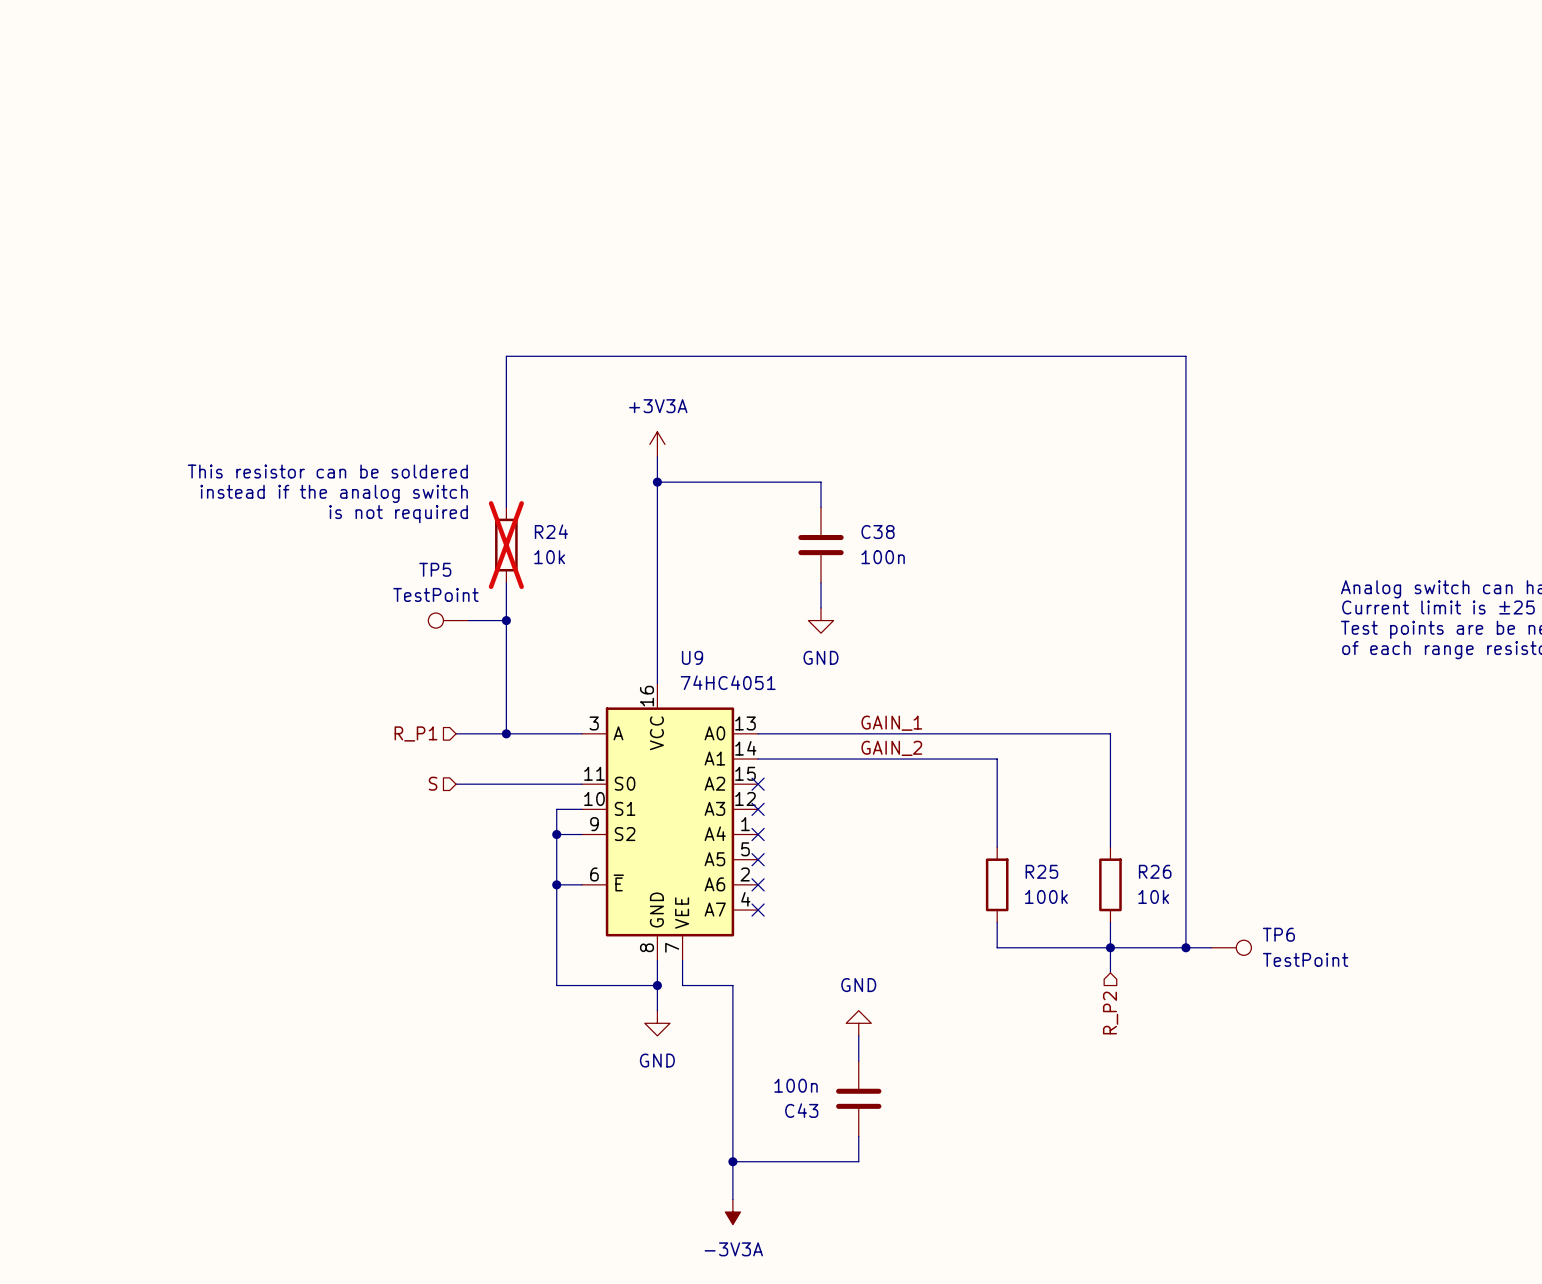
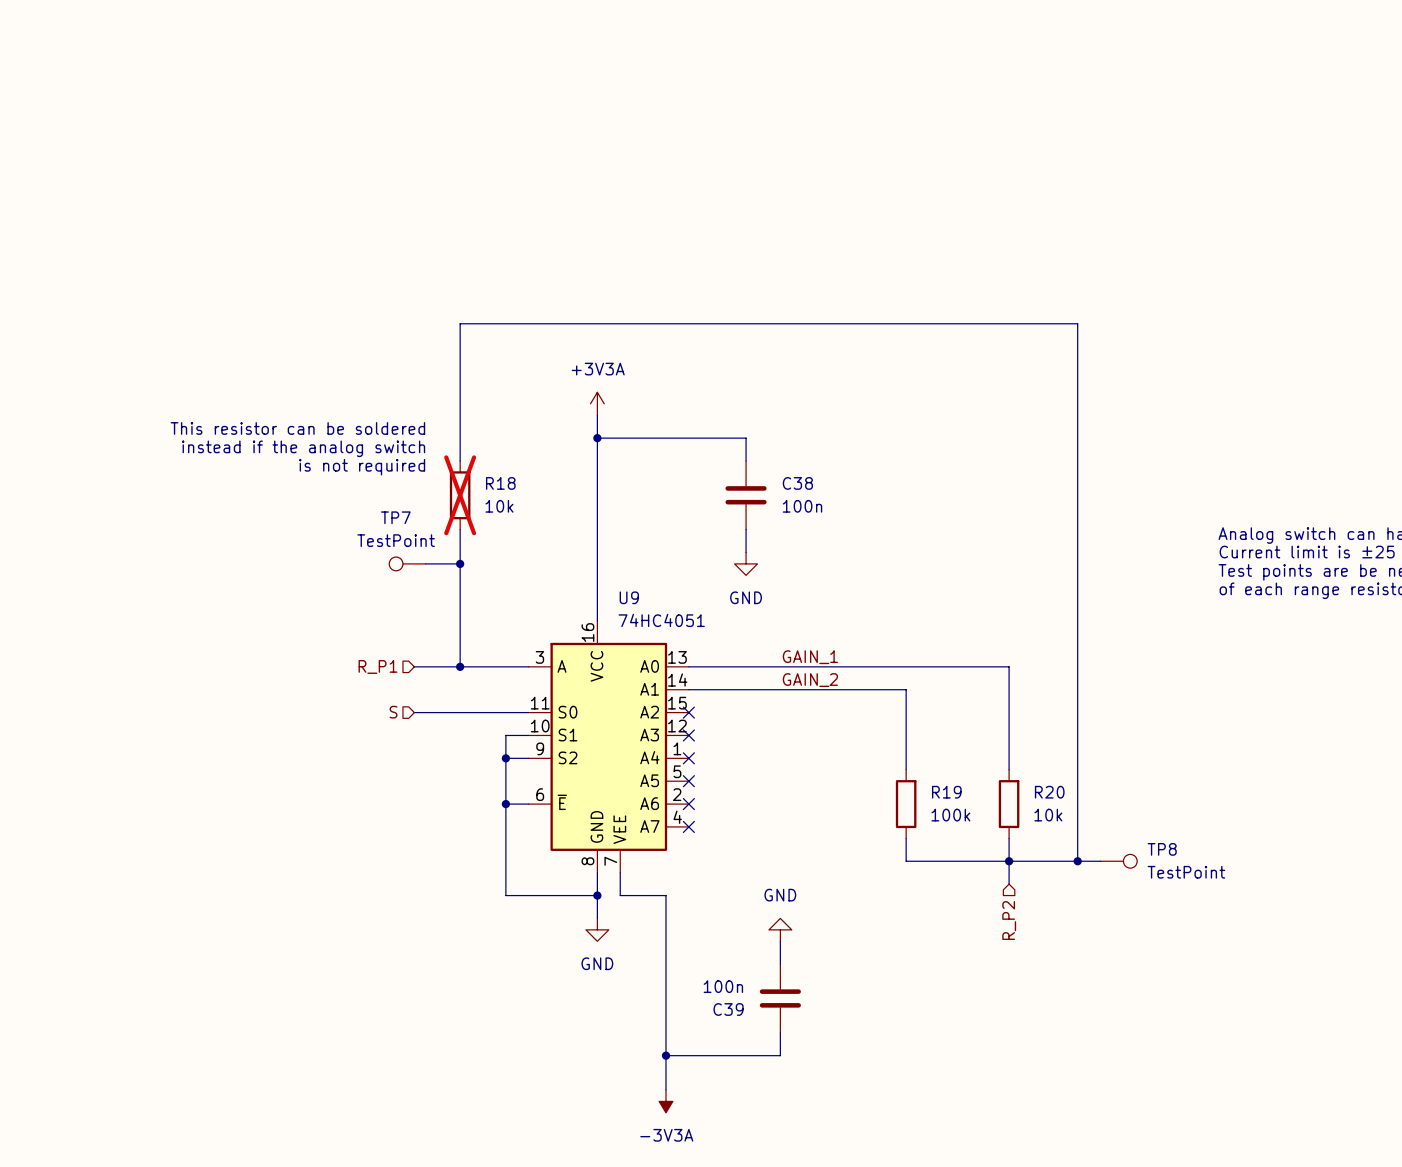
R24 name: R24 (551, 531) -> R18 (500, 483)
TP5 name: TP5 (435, 569) -> TP7 (395, 517)
R25 name: R25 (1041, 871) -> R19 (946, 792)
R26 name: R26 (1155, 871) -> R20 (1049, 792)
TP6 name: TP6 (1278, 934) -> TP8 (1162, 849)
C43 name: C43 (801, 1110) -> C39 (728, 1009)

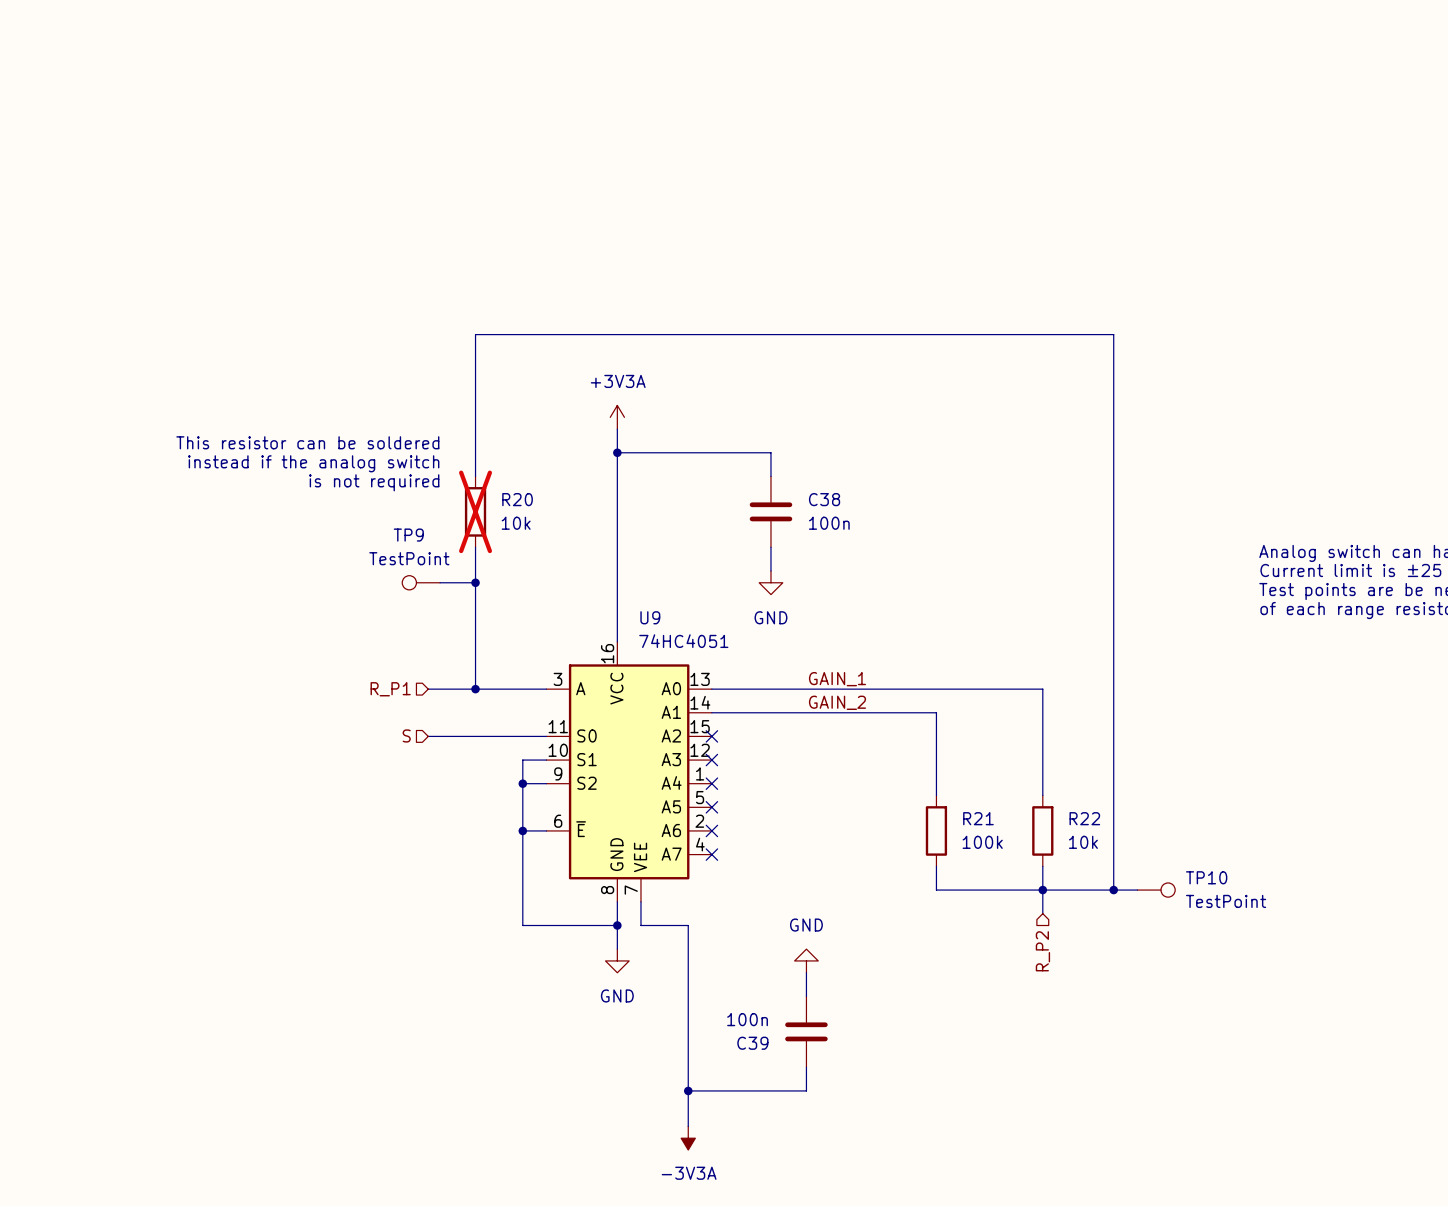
R18 name: R18 (500, 483) -> R20 (517, 499)
TP7 name: TP7 (395, 517) -> TP9 (408, 535)
R19 name: R19 (946, 792) -> R21 (978, 818)
R20 name: R20 (1049, 792) -> R22 (1084, 818)
TP8 name: TP8 (1162, 849) -> TP10 (1206, 877)

